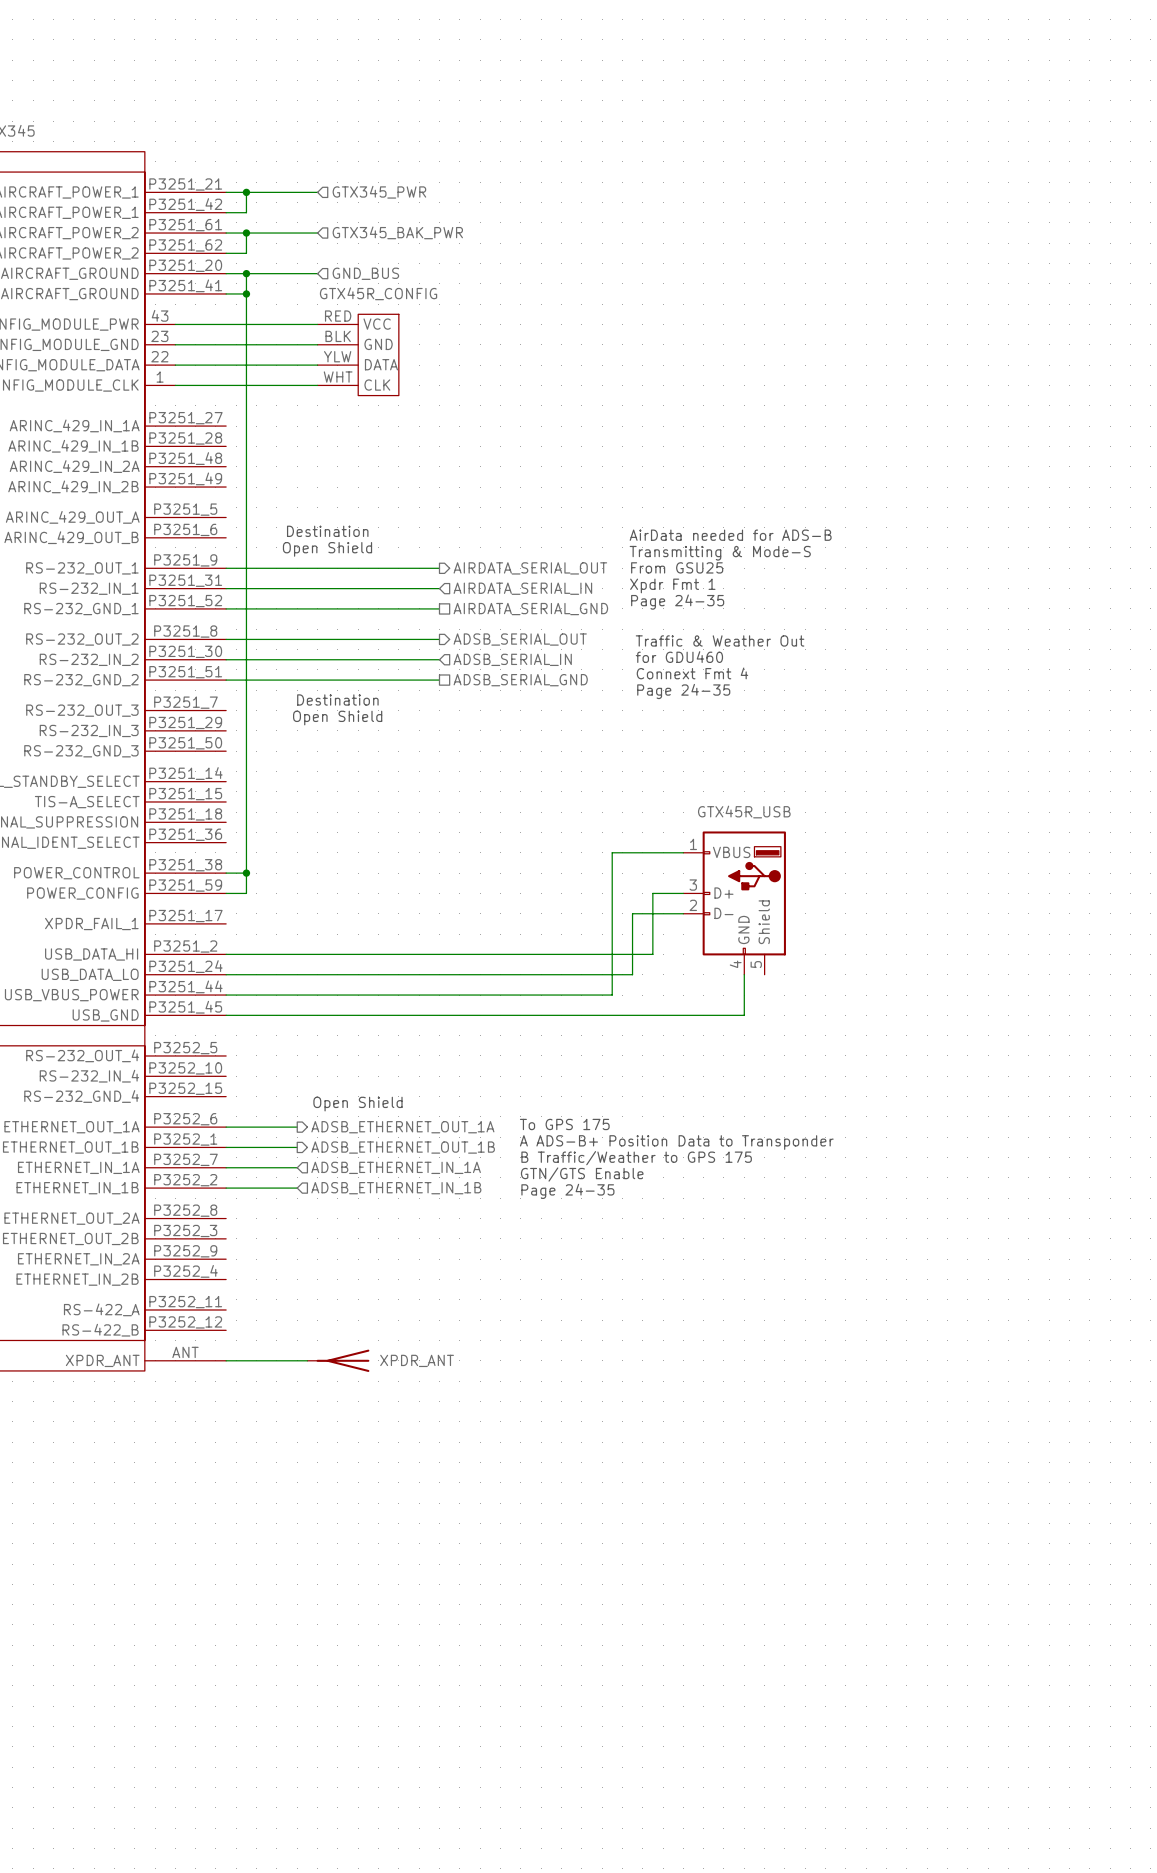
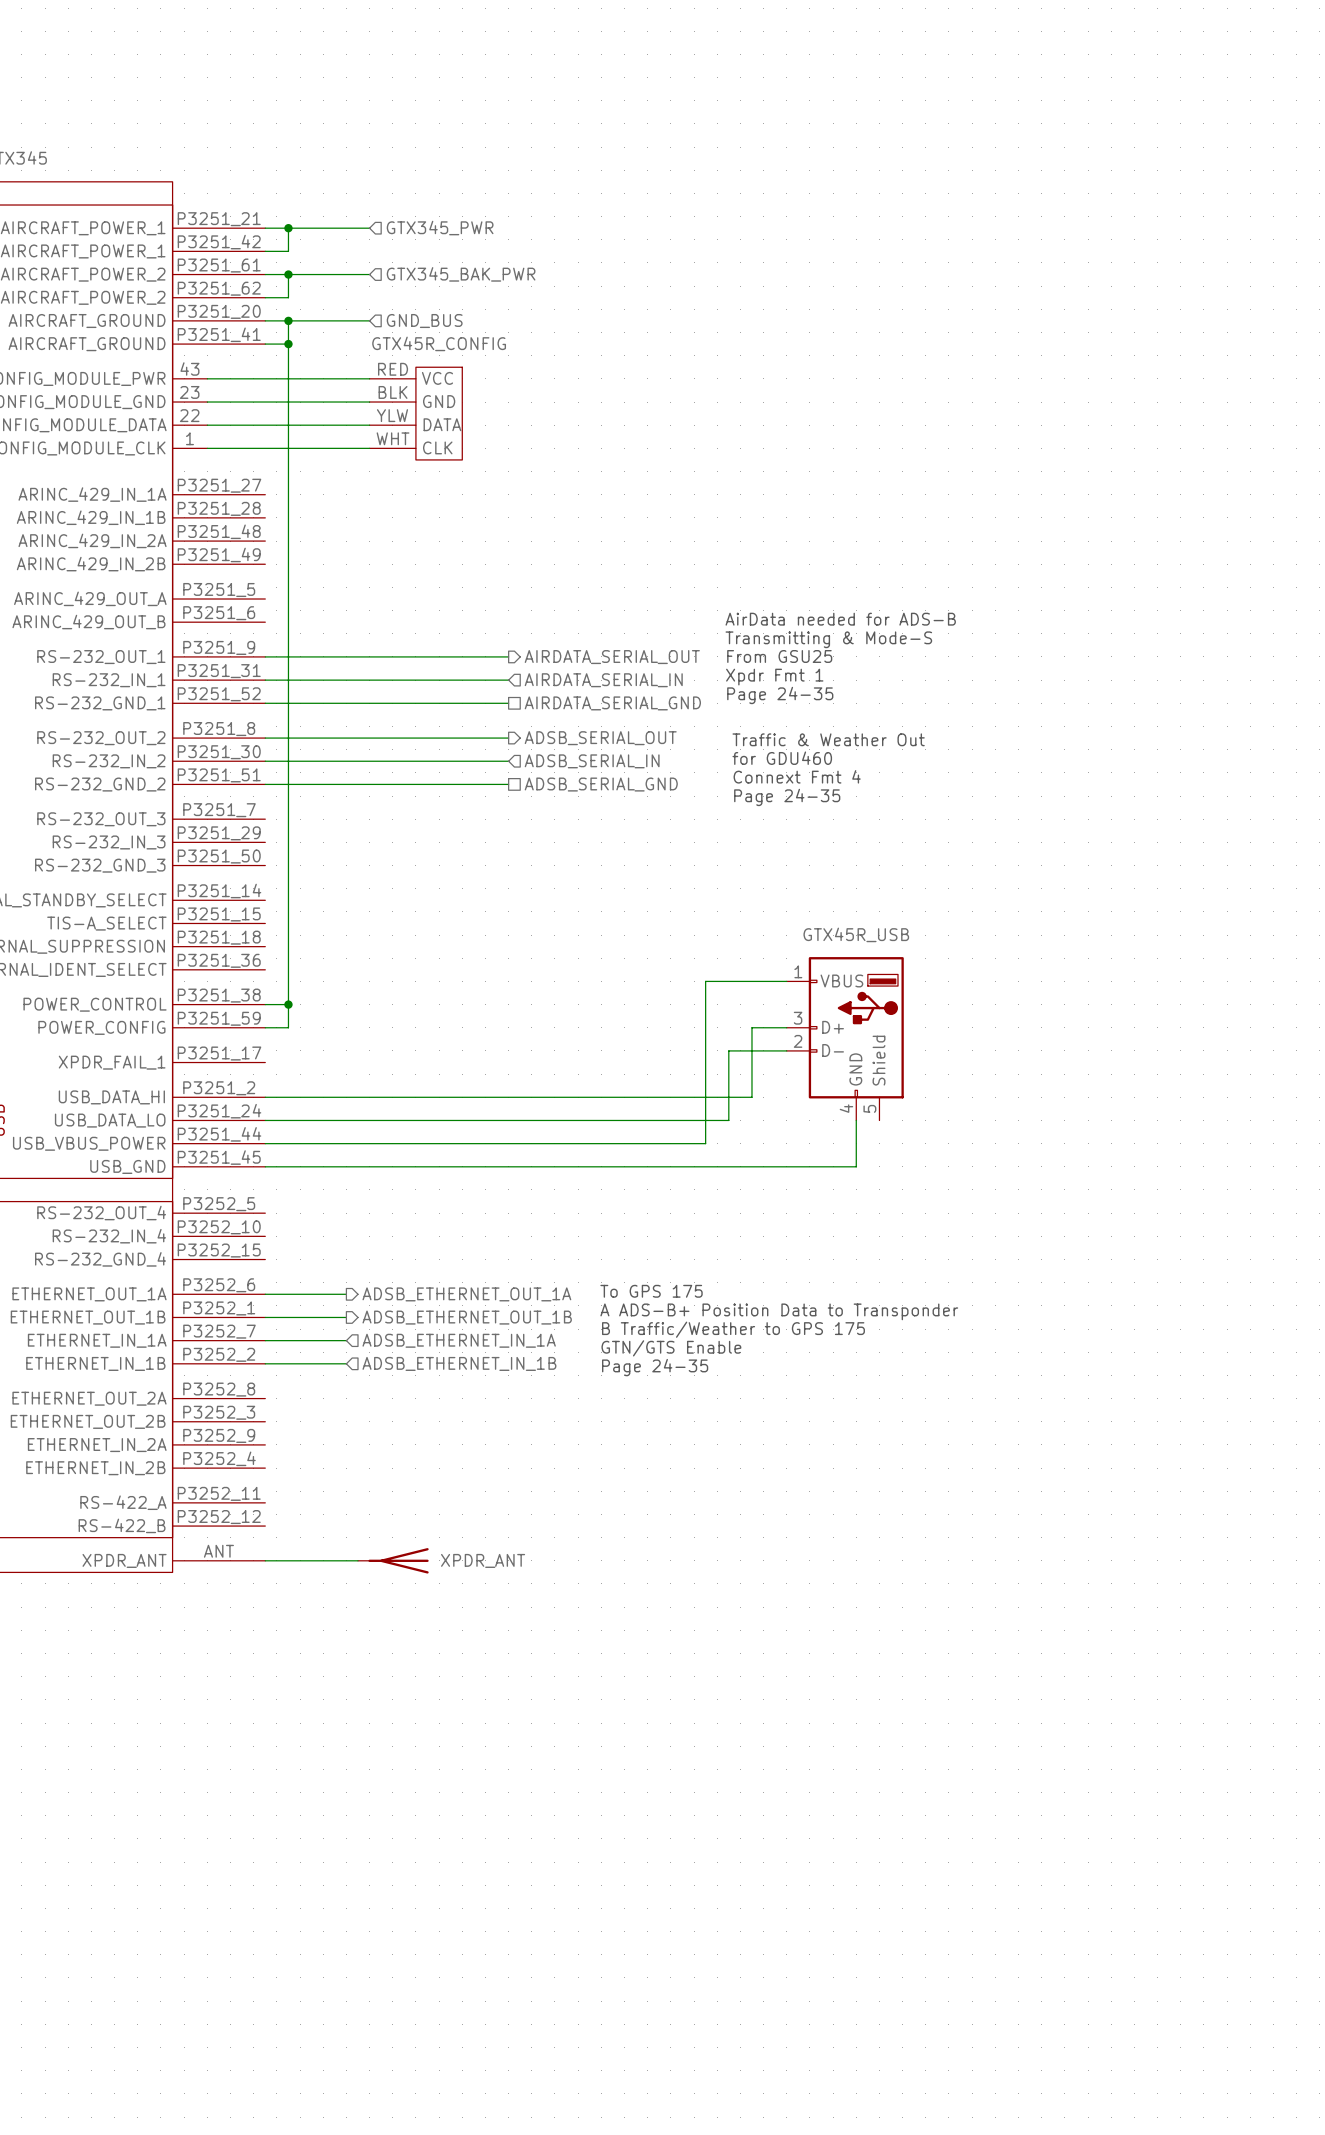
text: Destination (327, 531) -> none
text: Open Shield (327, 549) -> none
text: Destination (337, 699) -> none
text: Open Shield (337, 718) -> none
text: Open Shield (357, 1104) -> none

